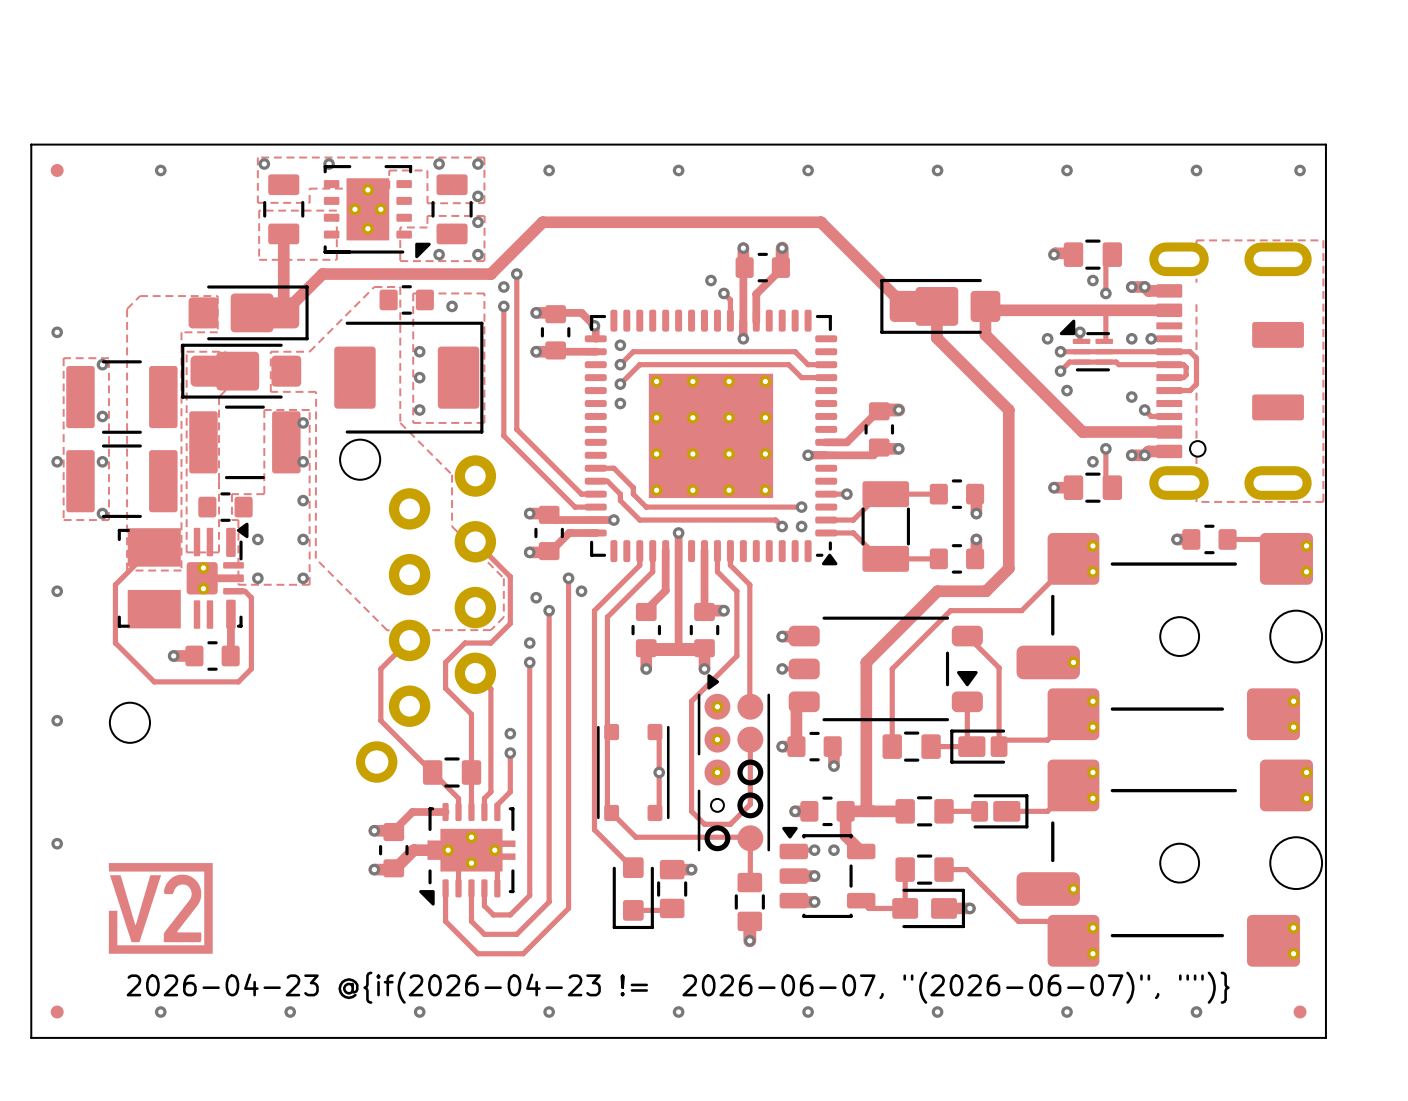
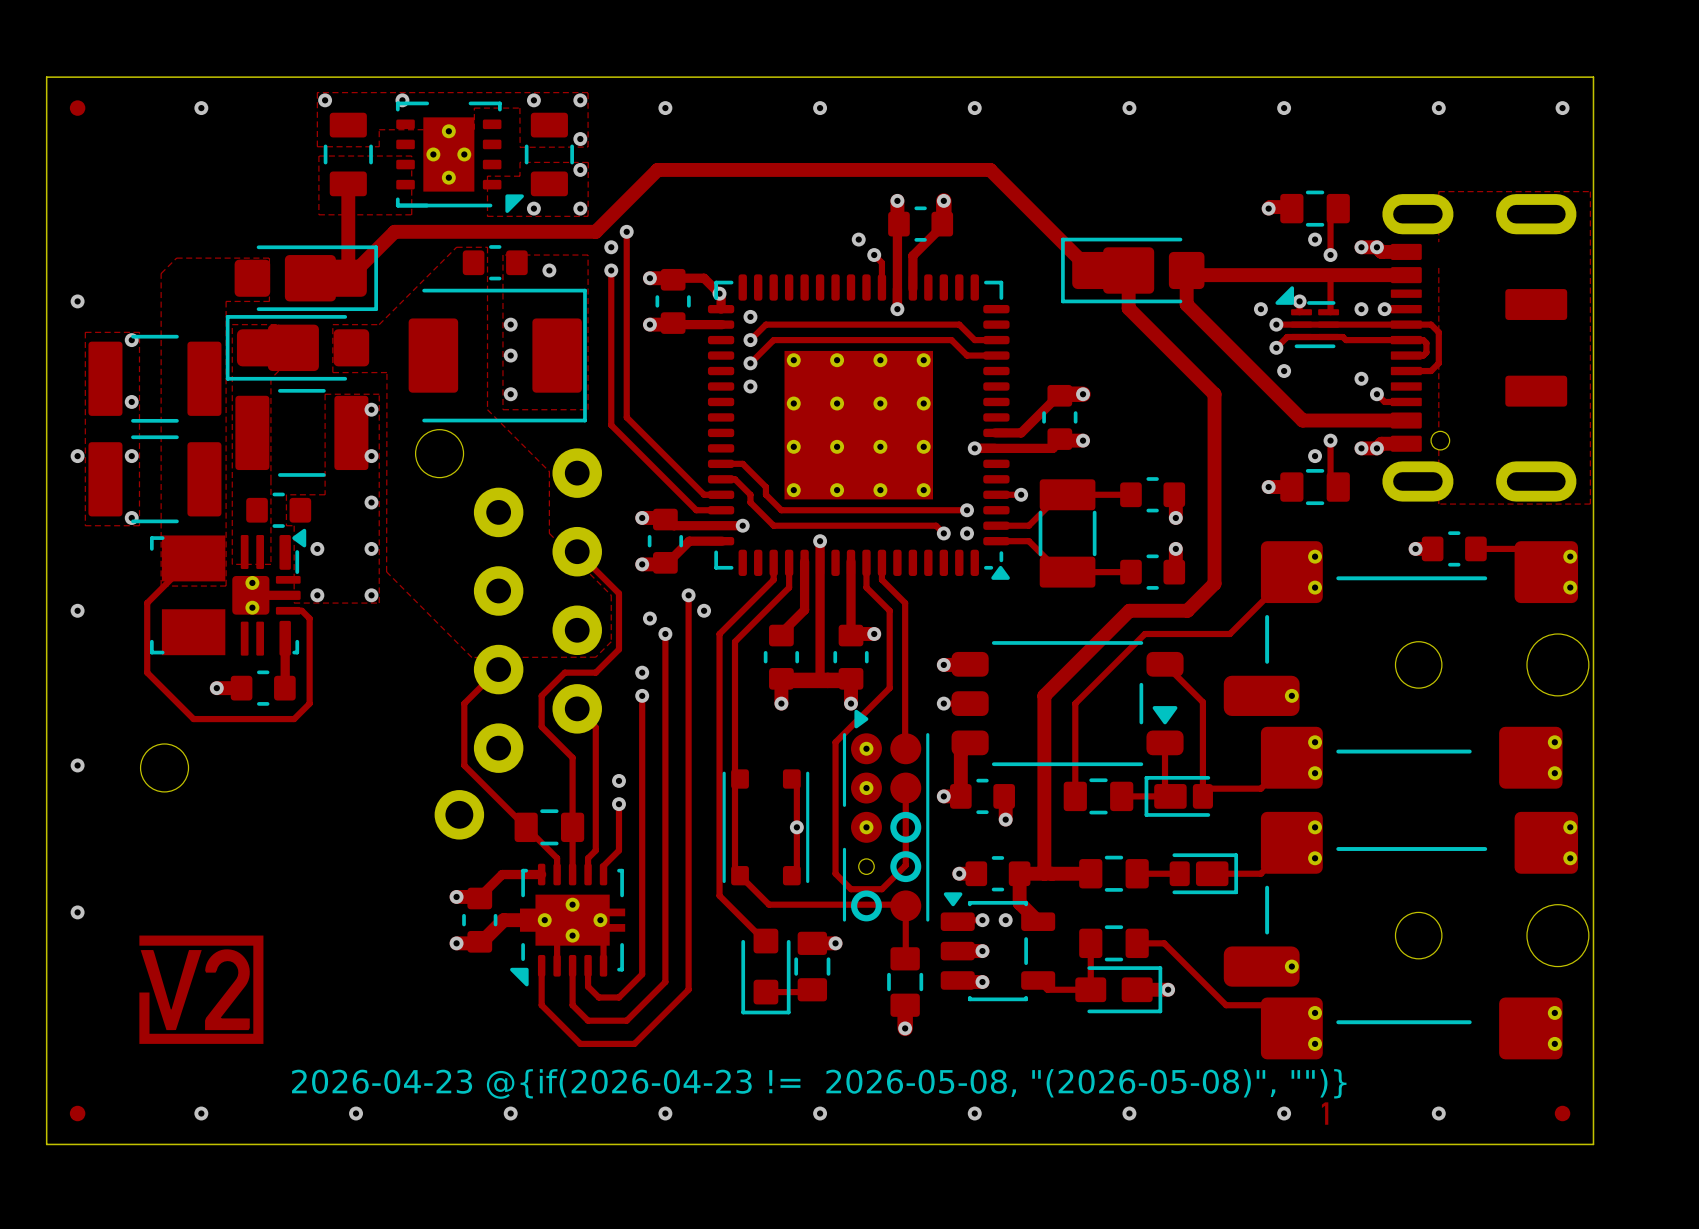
drawing shape: [126, 971, 1230, 1004] -> [292, 1069, 1347, 1099]
drawing: none -> [1321, 1102, 1329, 1125]

